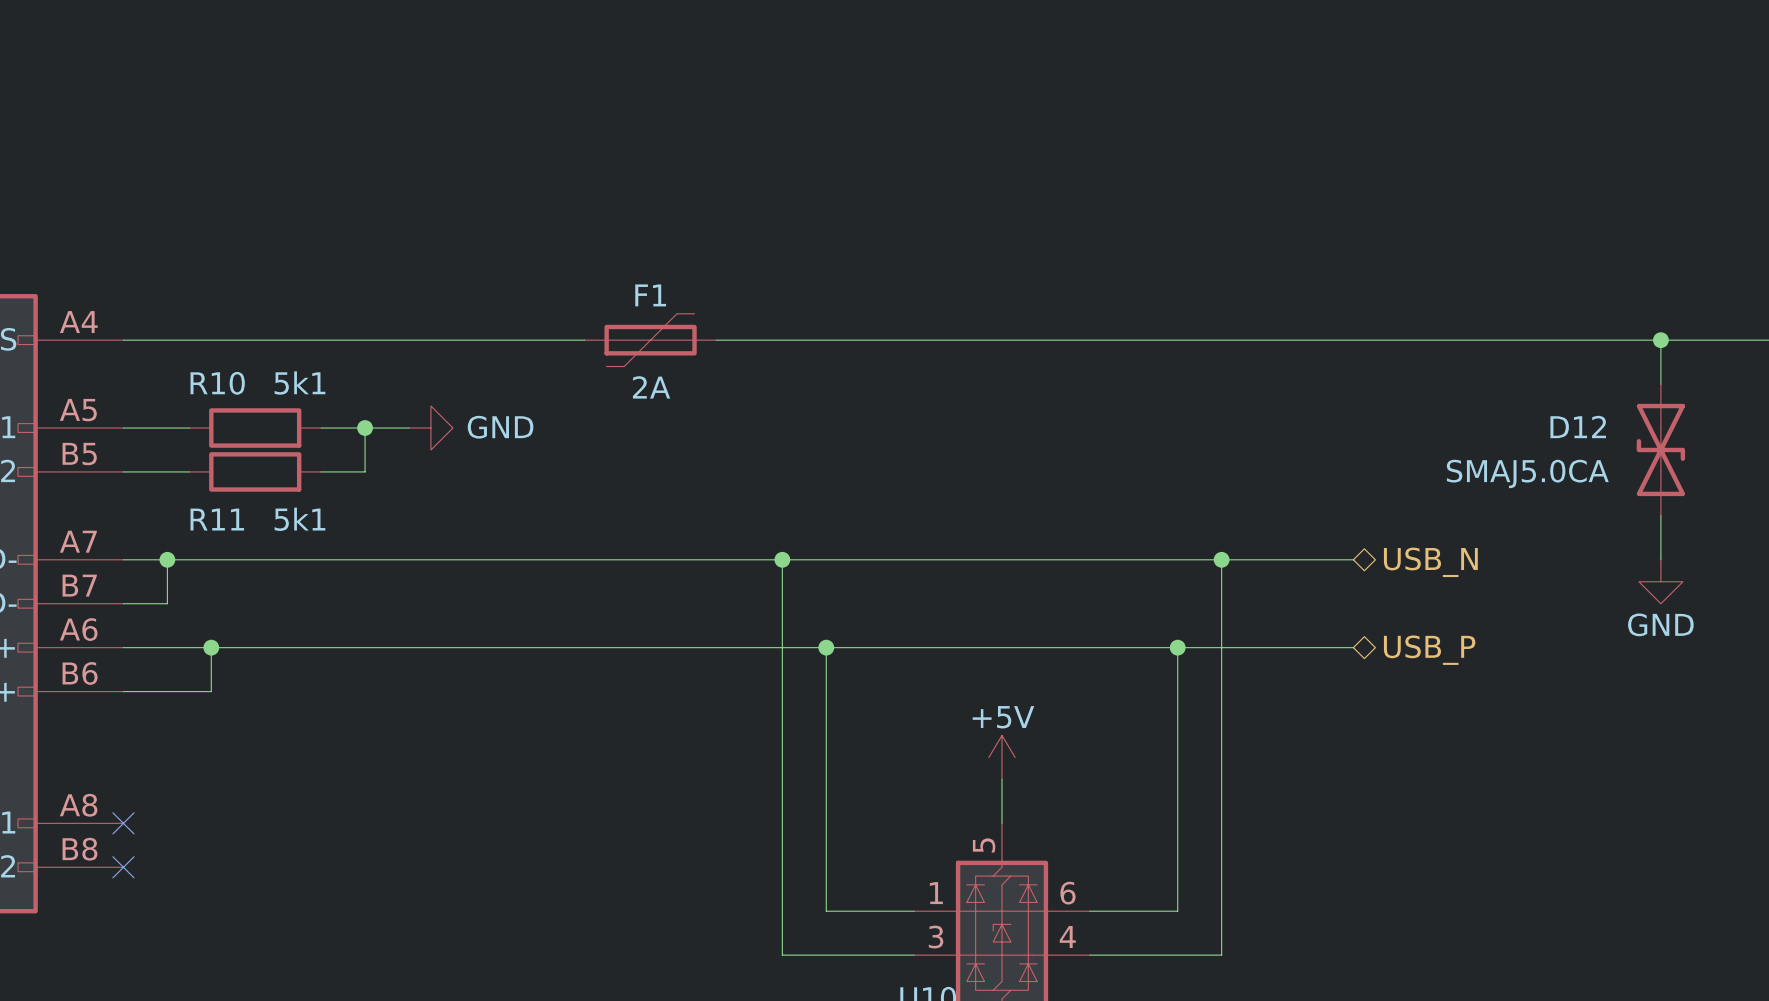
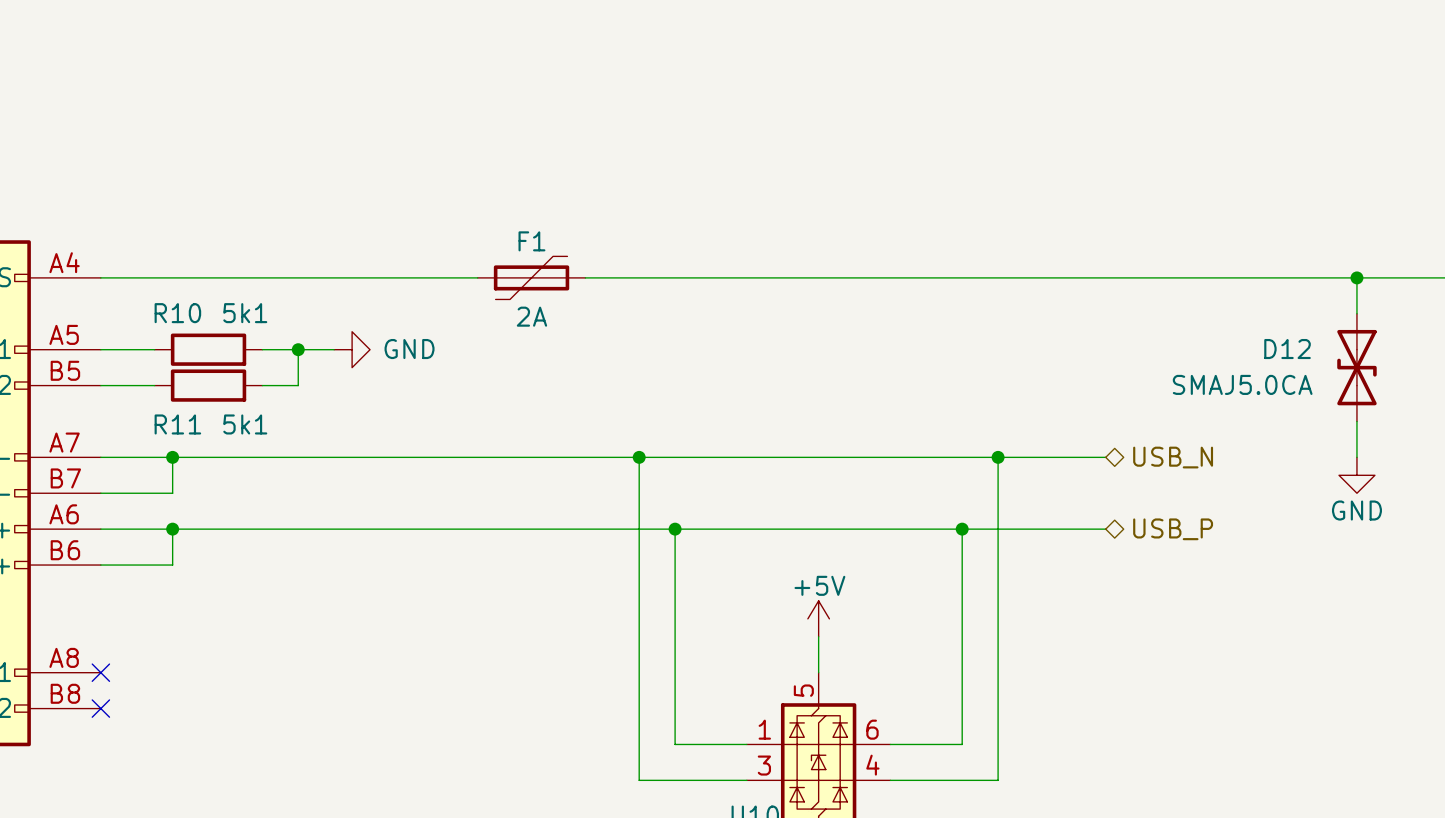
wire: (167, 559) (167, 603) -> (172, 457) (172, 493) (136, 493)
junction position: (167, 559) -> (172, 457)

